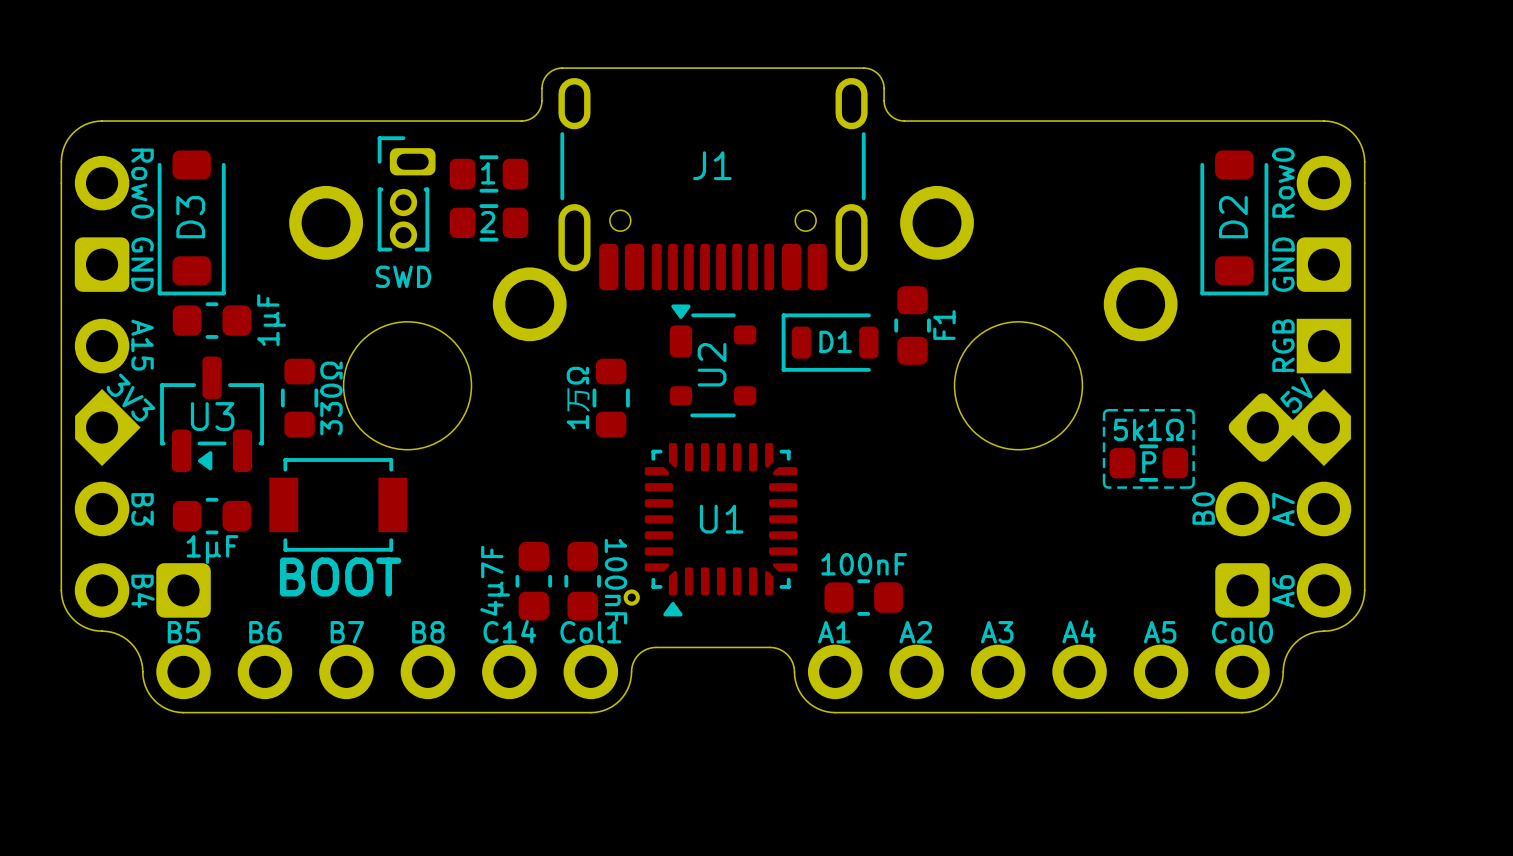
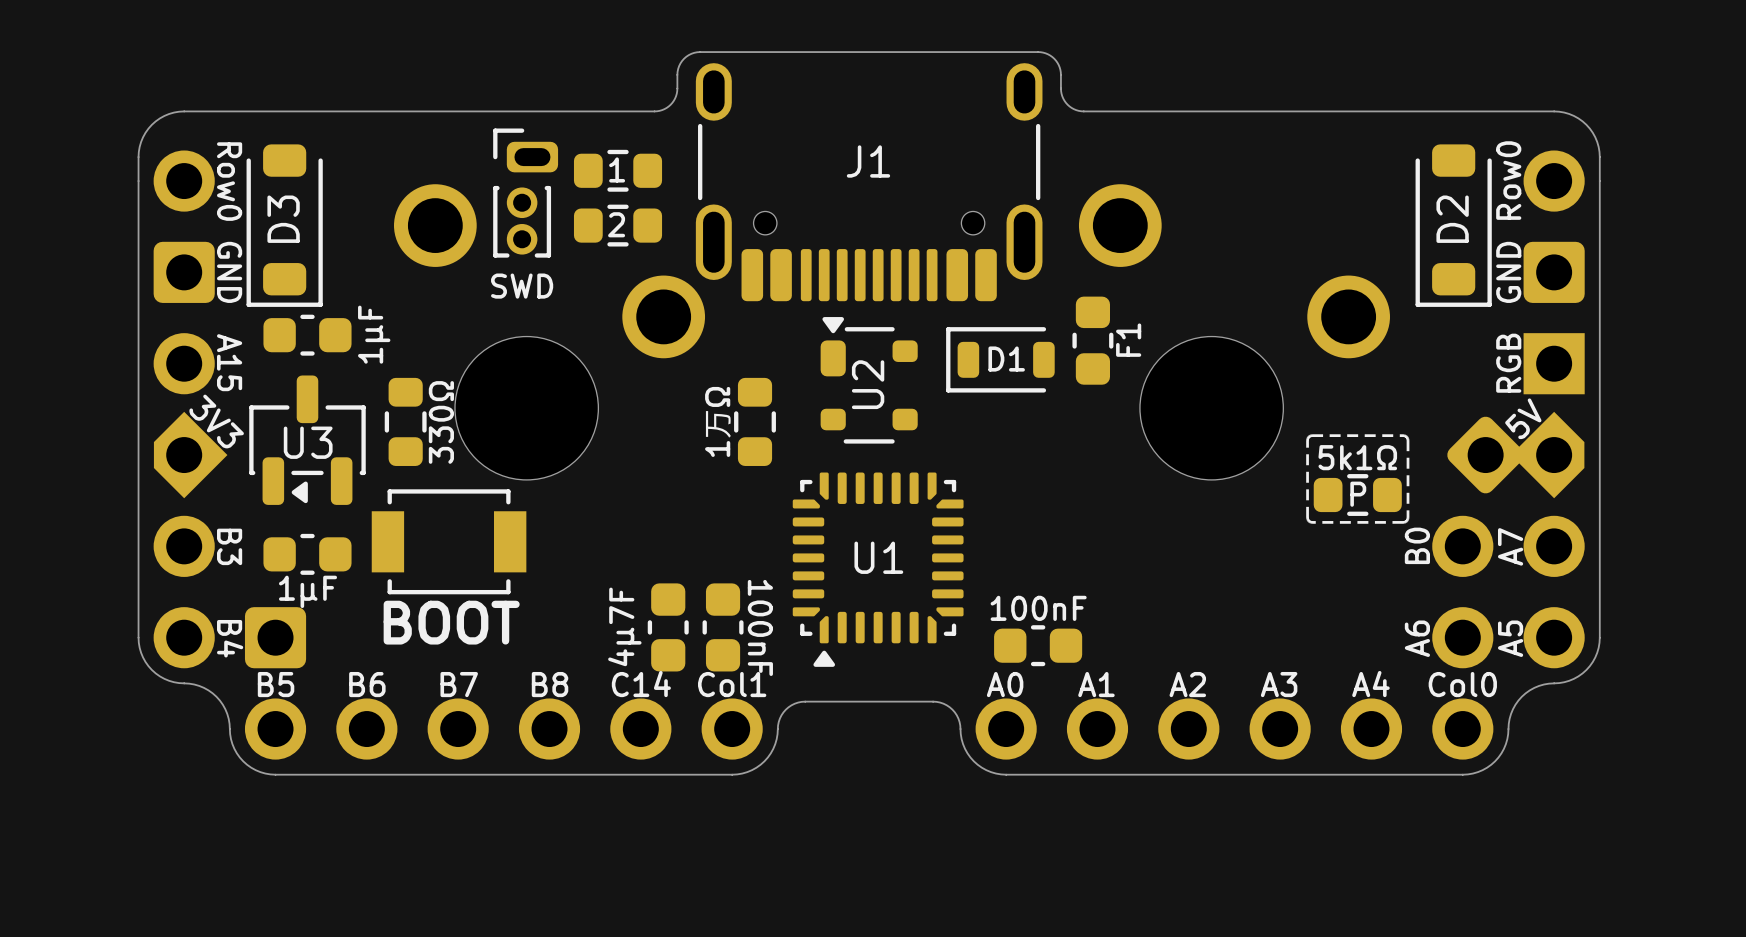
part footprint: [60, 155, 1366, 714] -> [137, 150, 1601, 776]
part: (631, 597) -> none

